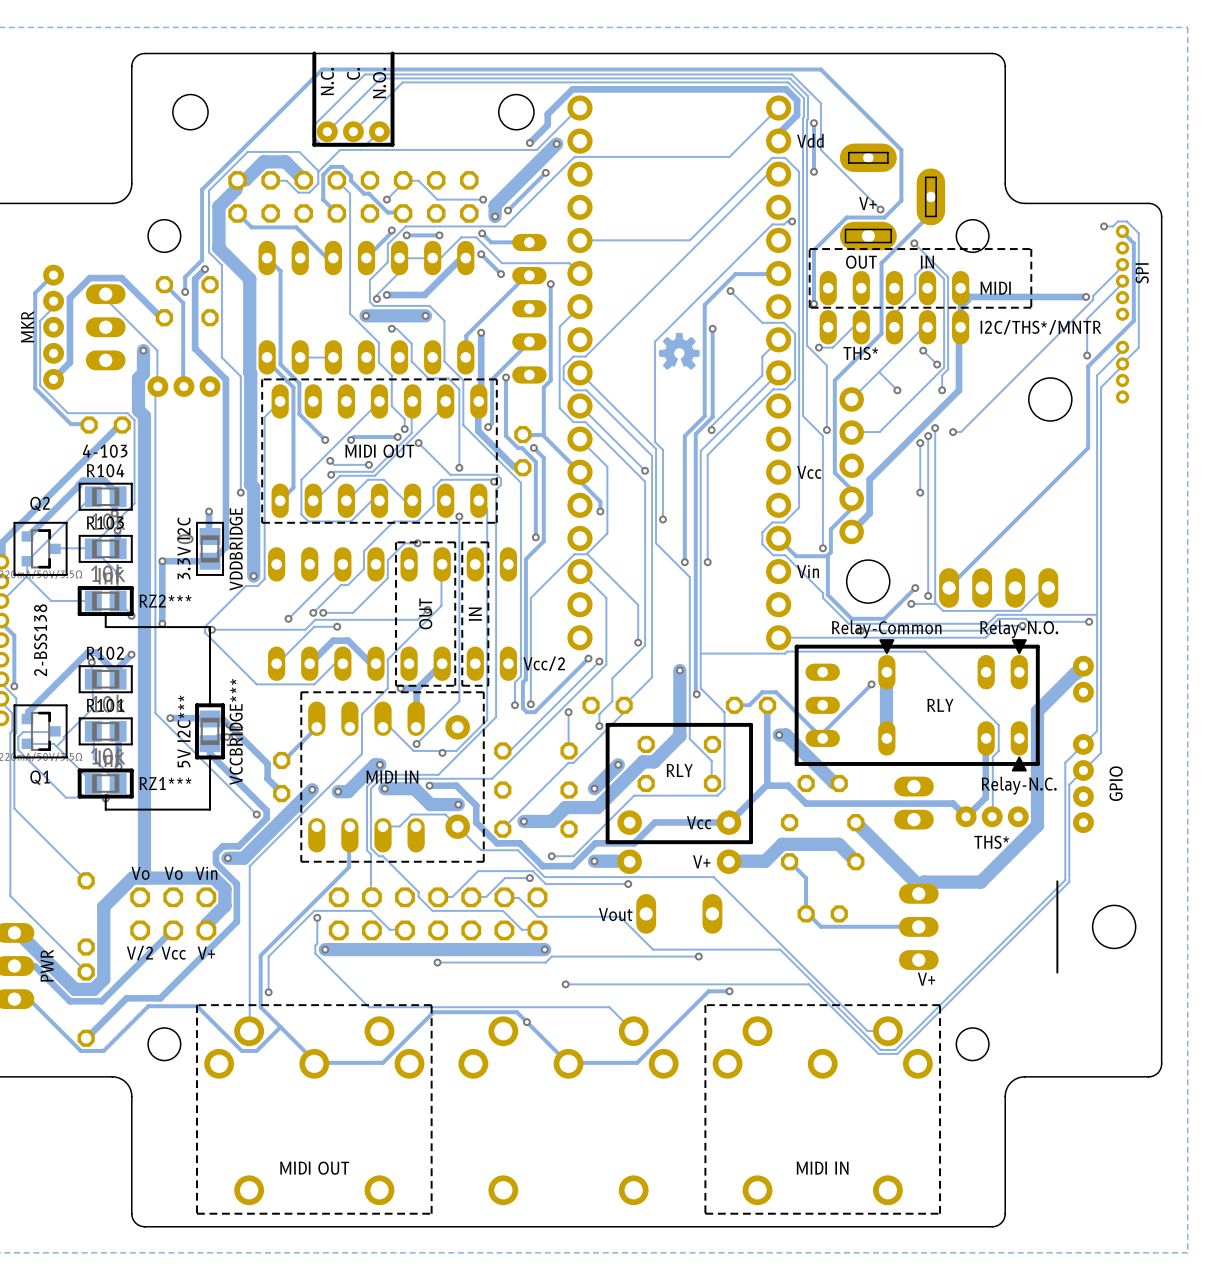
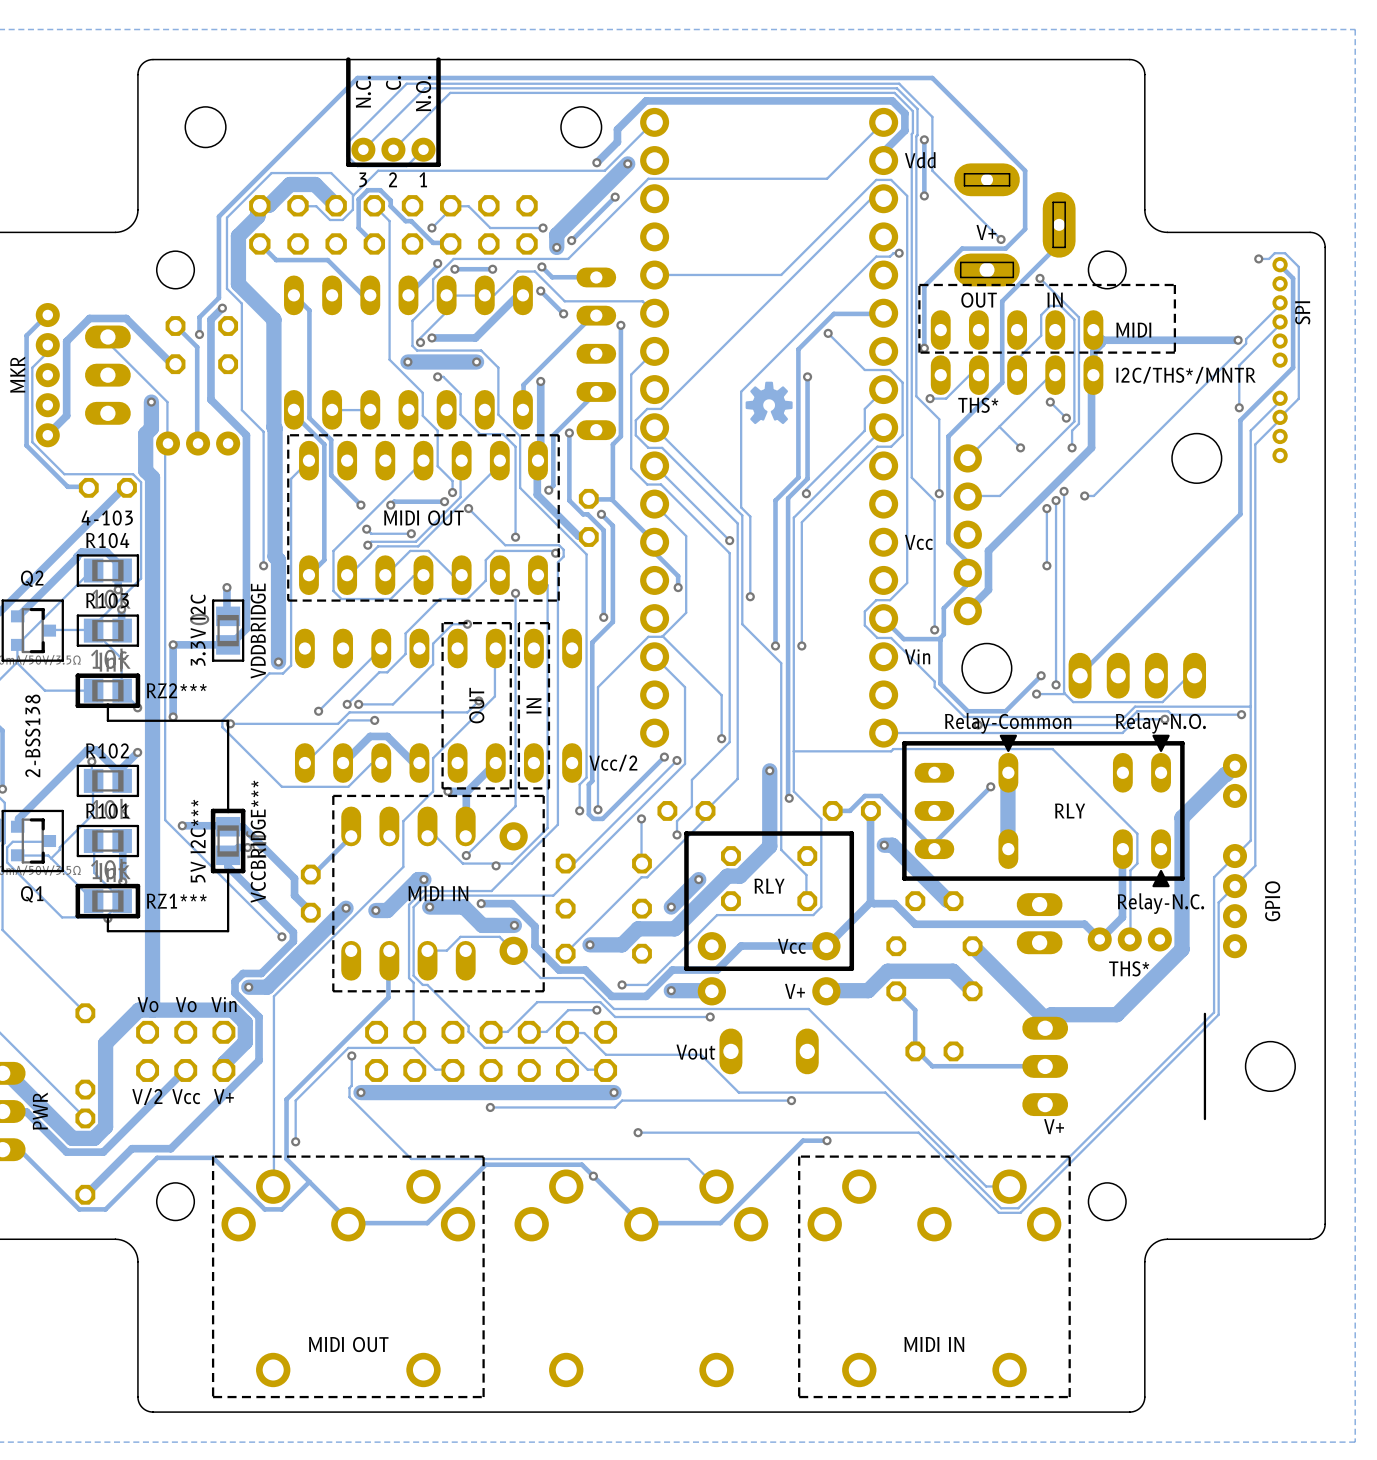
text: none -> 3 (363, 179)
text: none -> 2 (393, 179)
text: none -> 1 (423, 179)

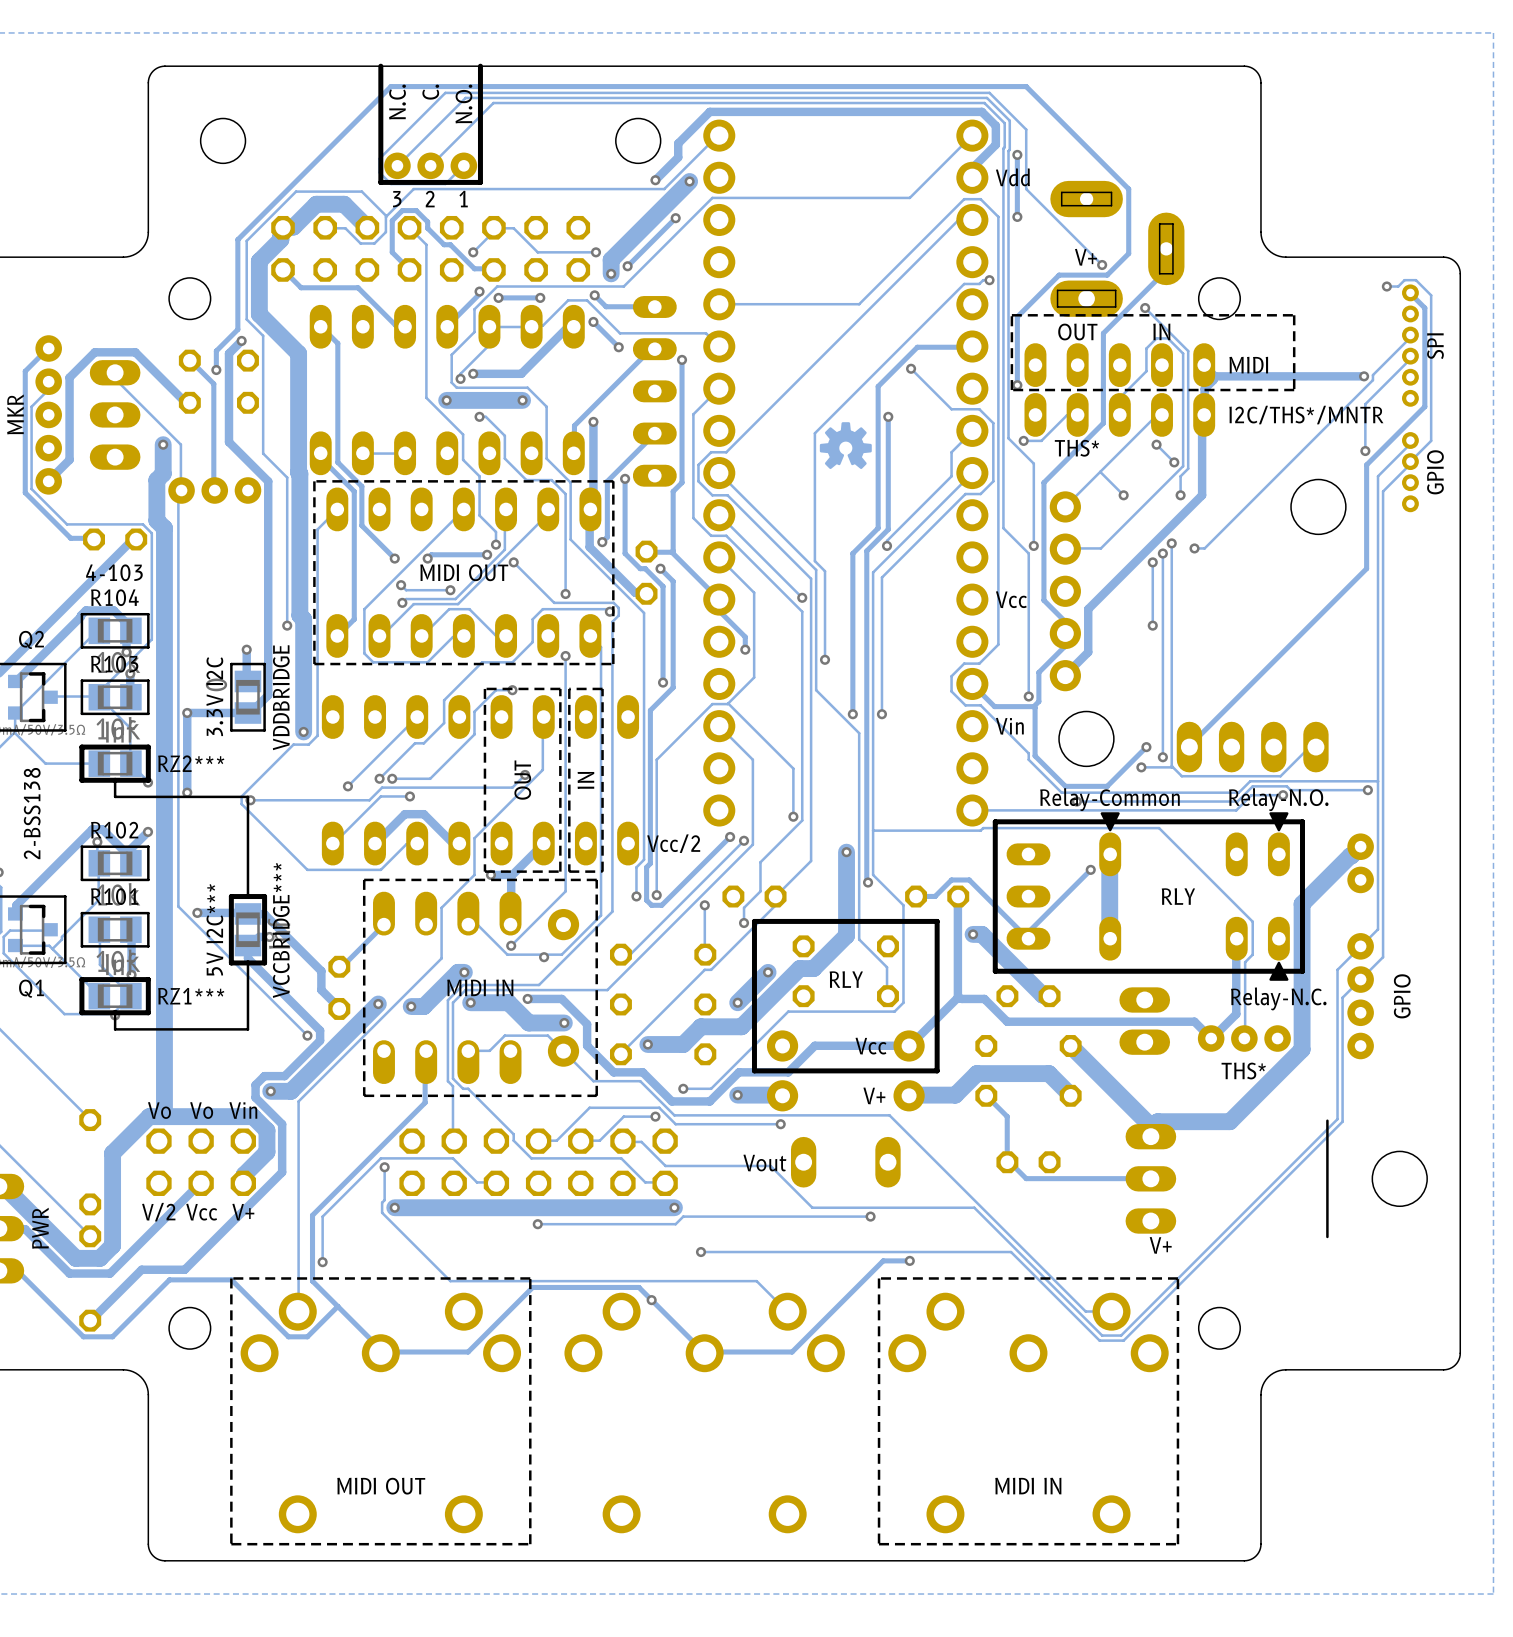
text: none -> GPIO (1435, 472)

